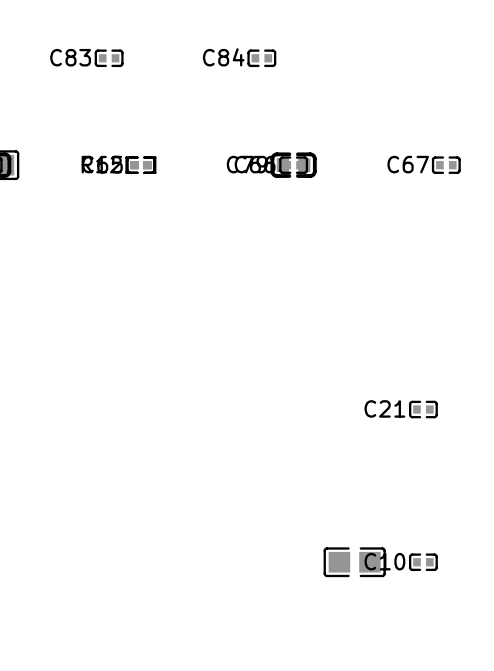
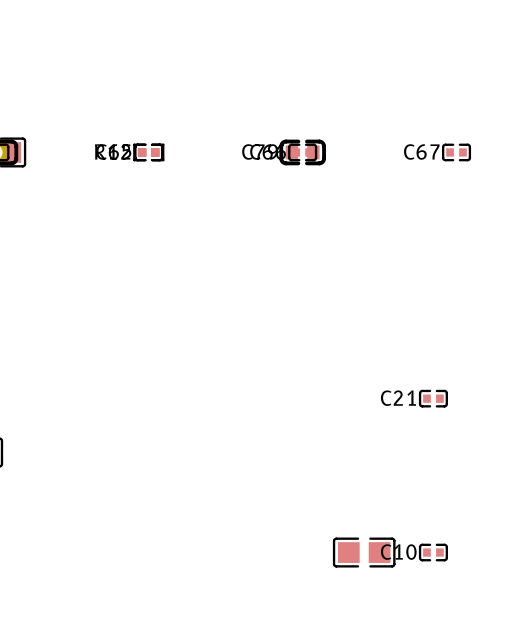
C83: (109, 58) -> none
C84: (261, 58) -> none

